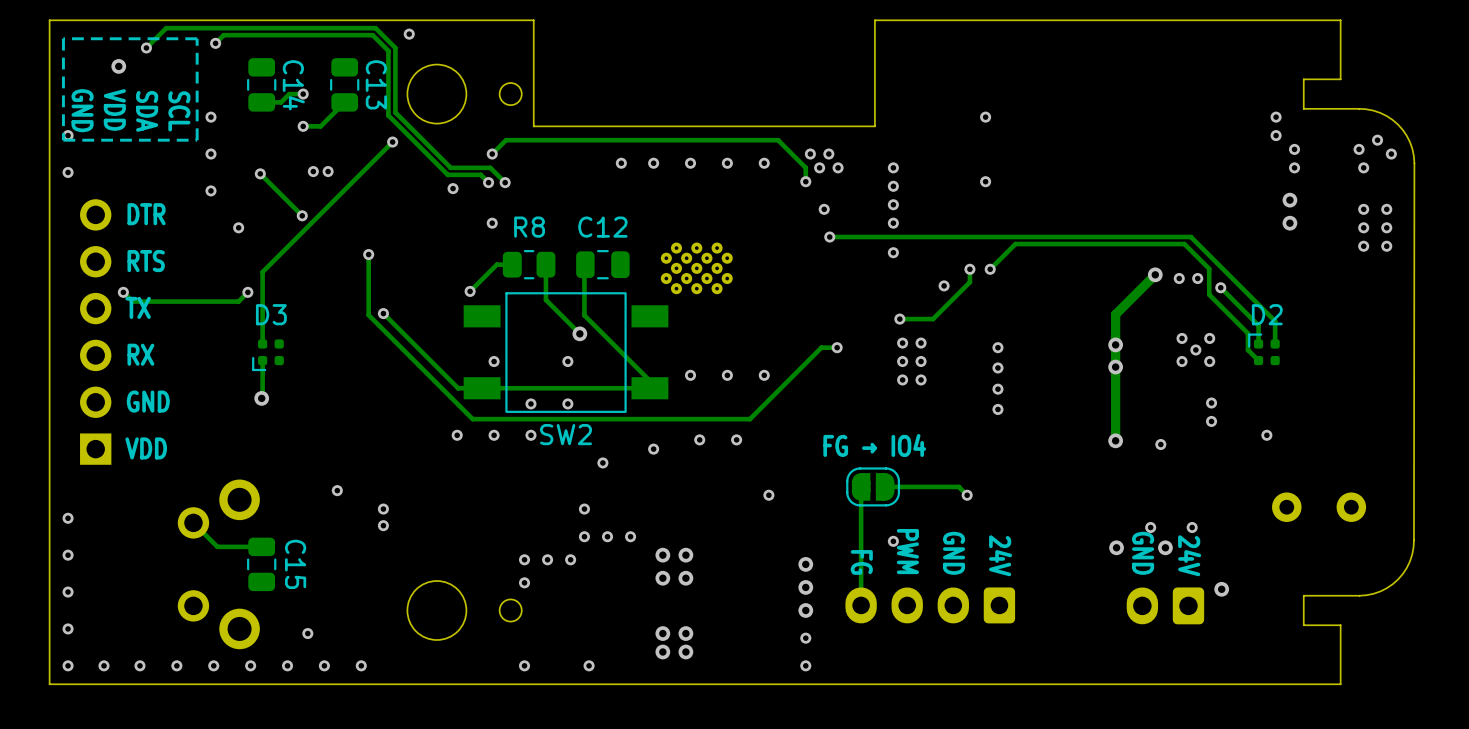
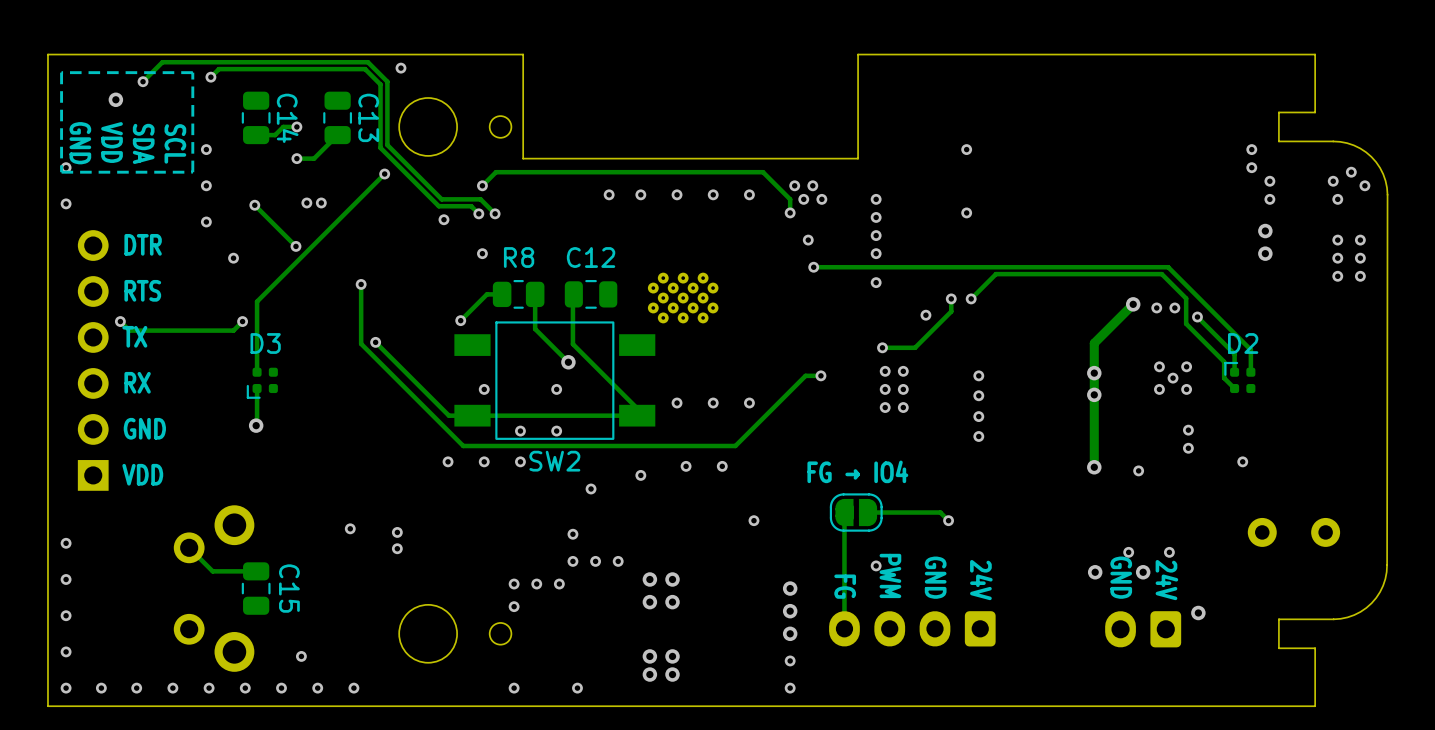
via: (337, 490) -> none
via: none -> (350, 528)
via: none -> (397, 532)
via: (383, 509) -> none
via: none -> (397, 548)
via: (383, 525) -> none

